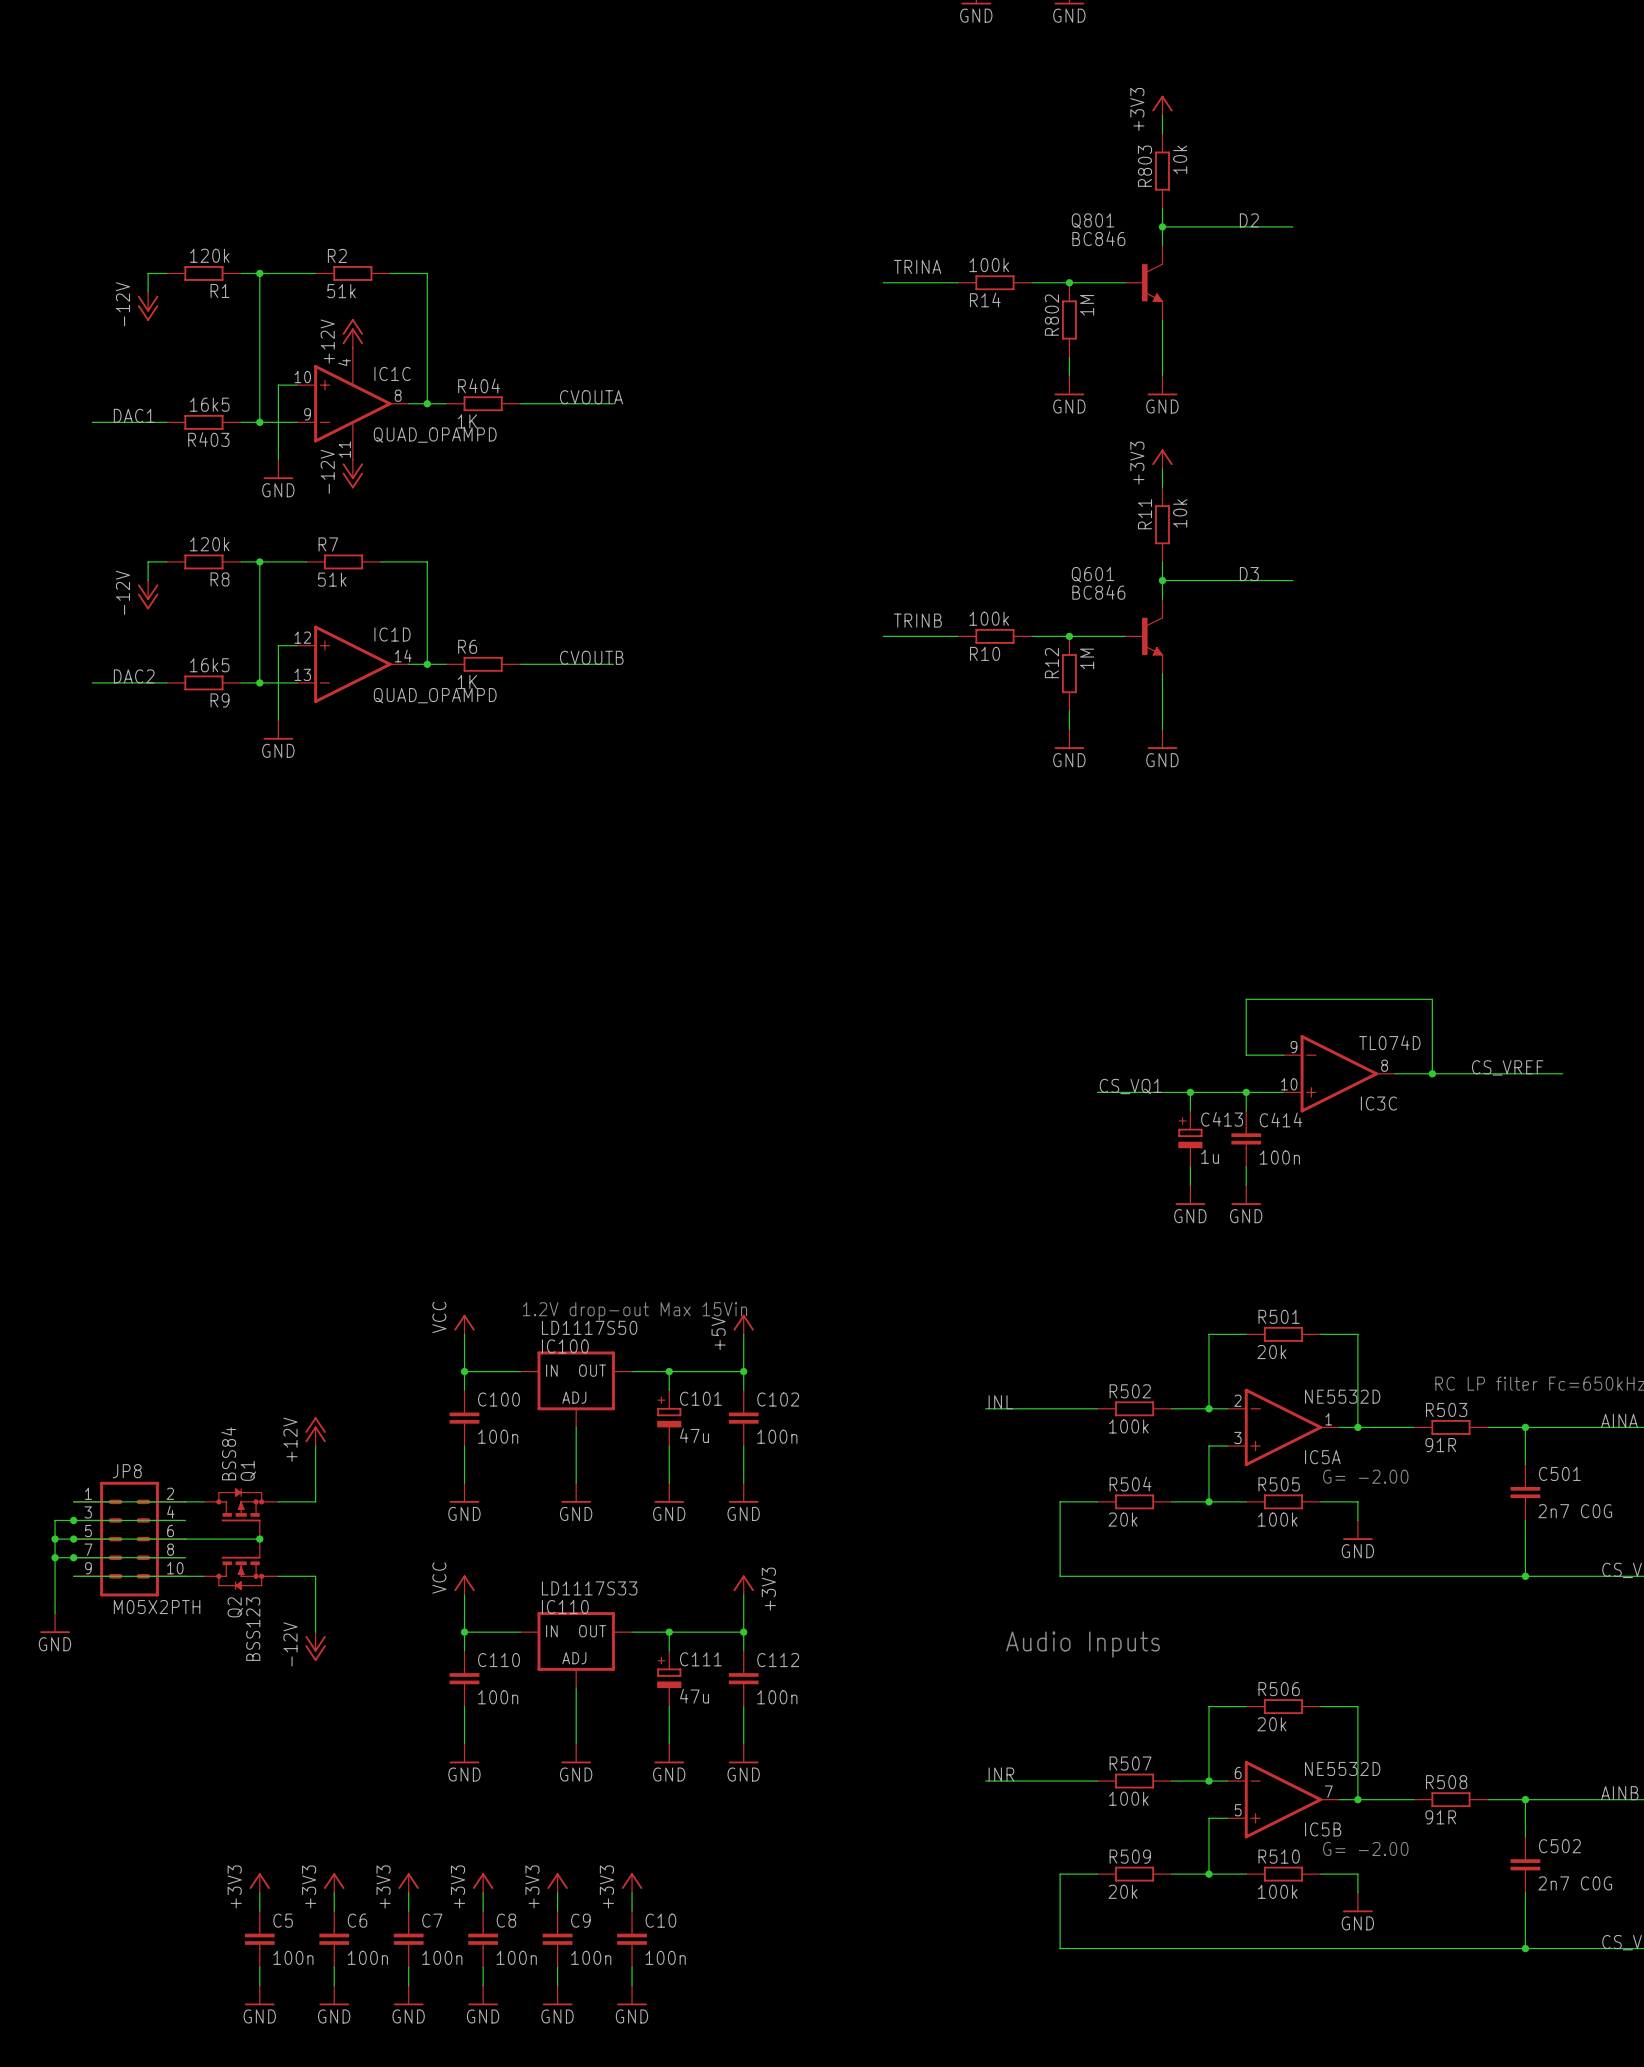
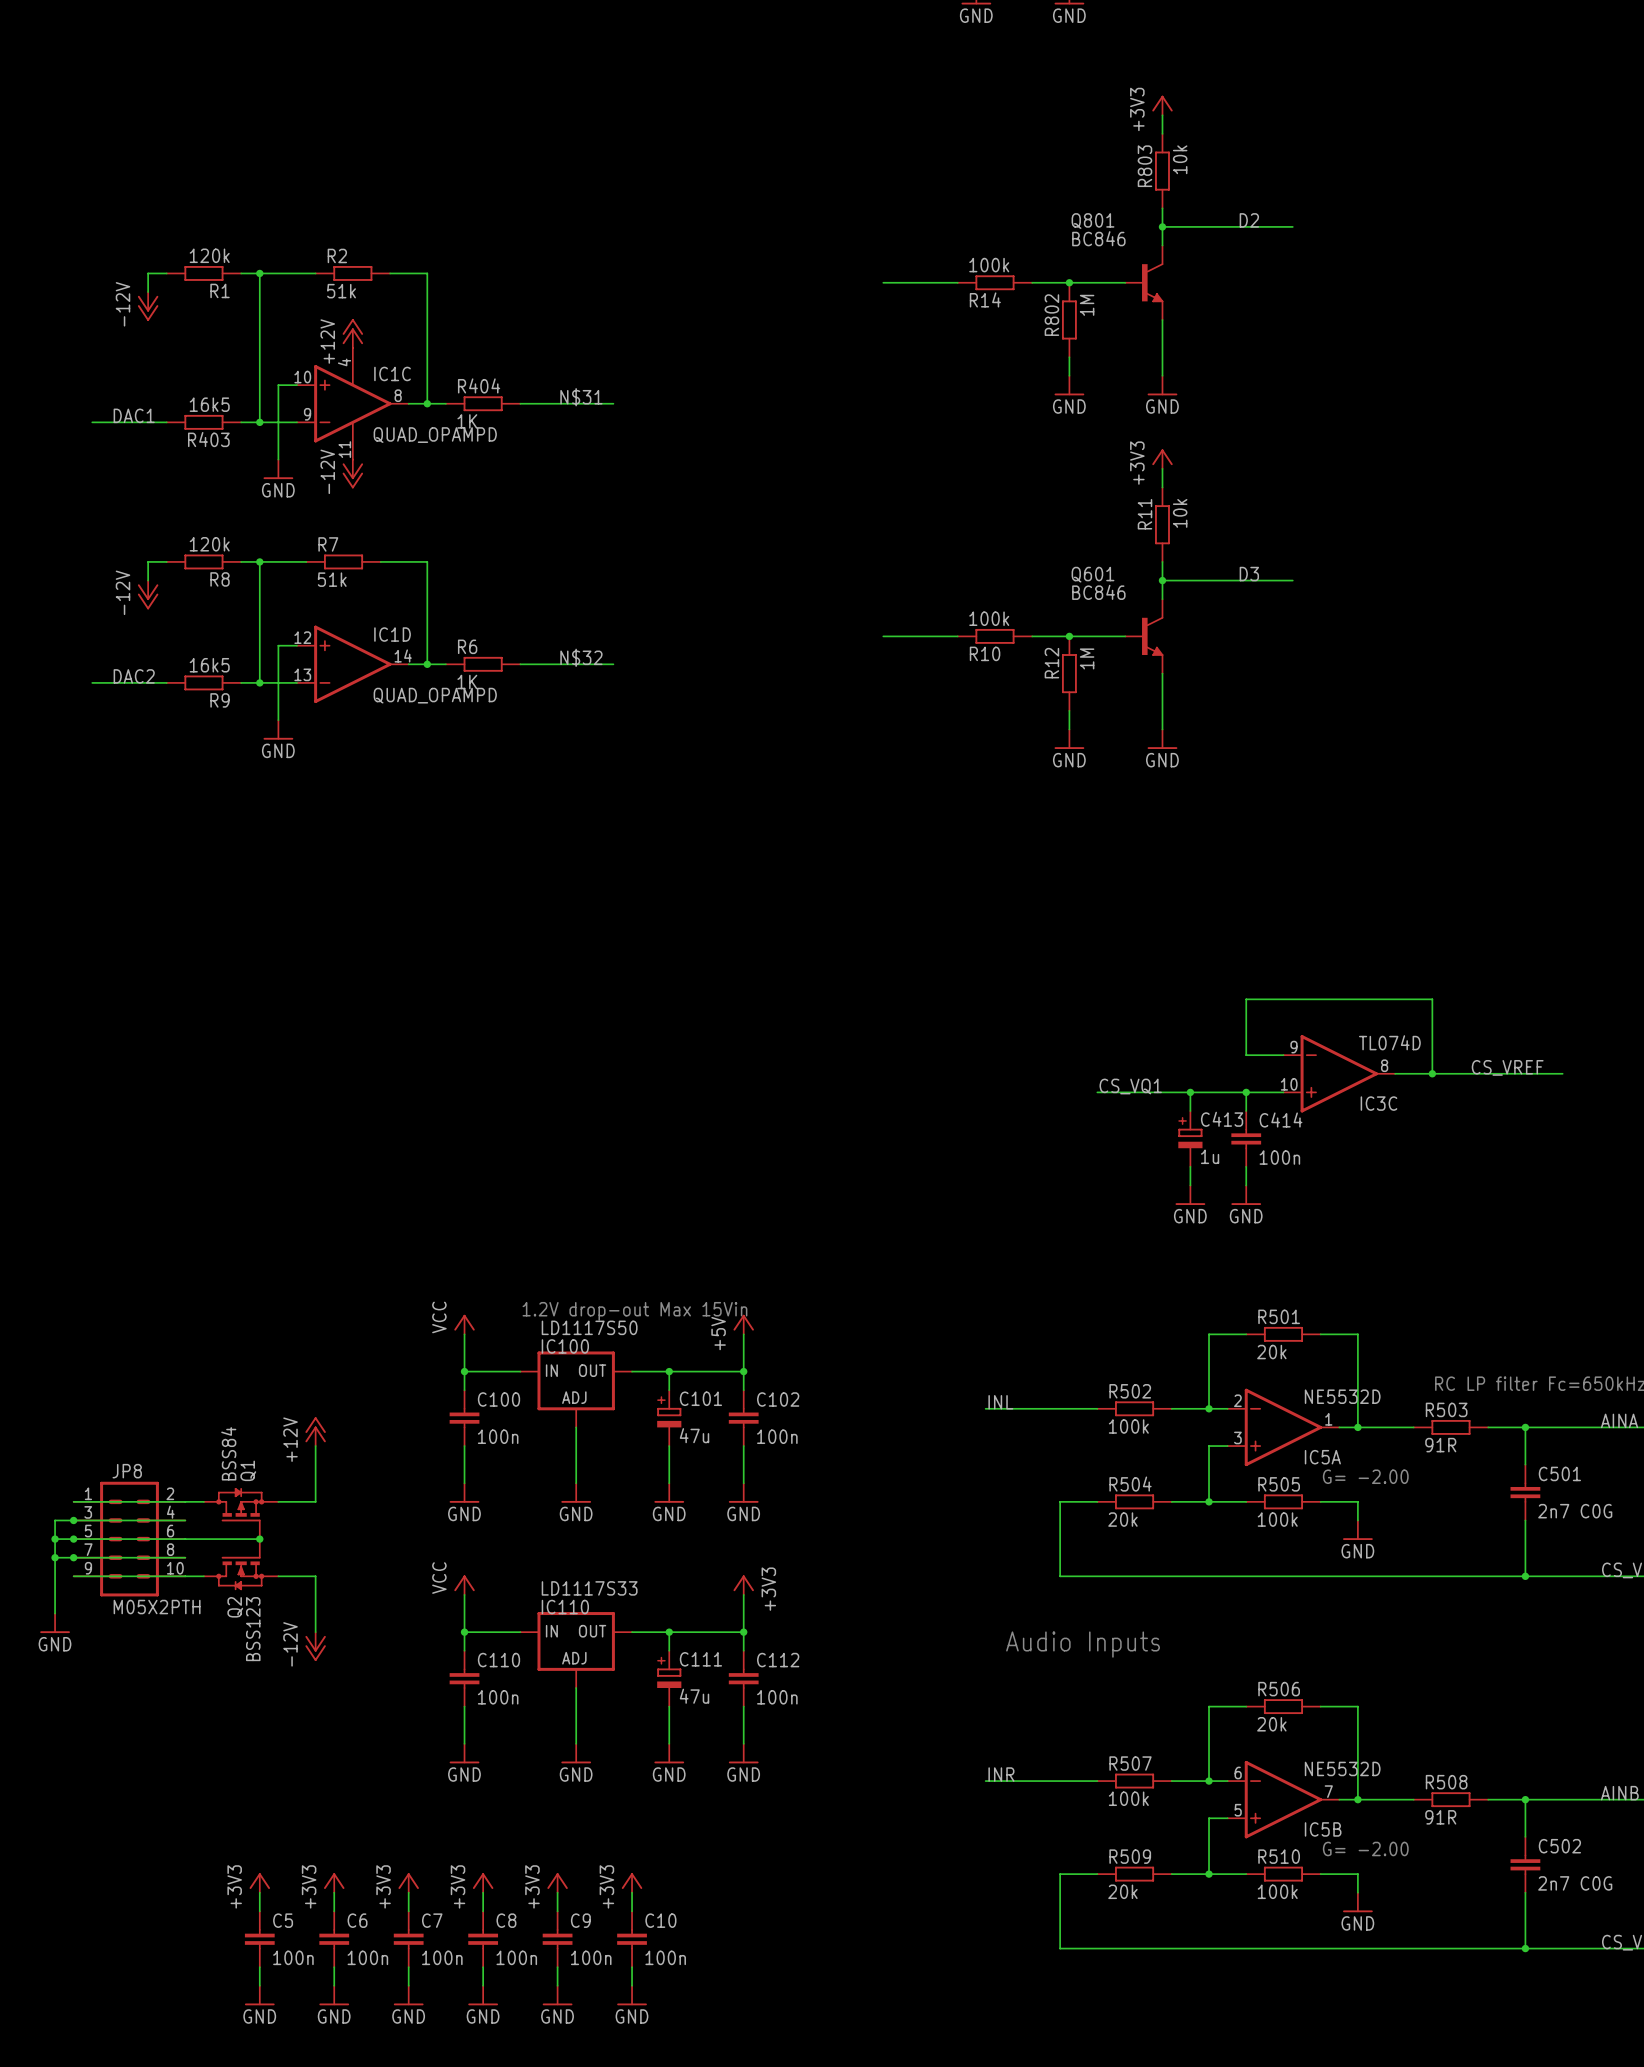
label: TRINA (917, 266) -> none
label: CVOUTA (591, 397) -> N$31 (581, 397)
label: TRINB (917, 620) -> none
label: CVOUTB (591, 657) -> N$32 (581, 657)

